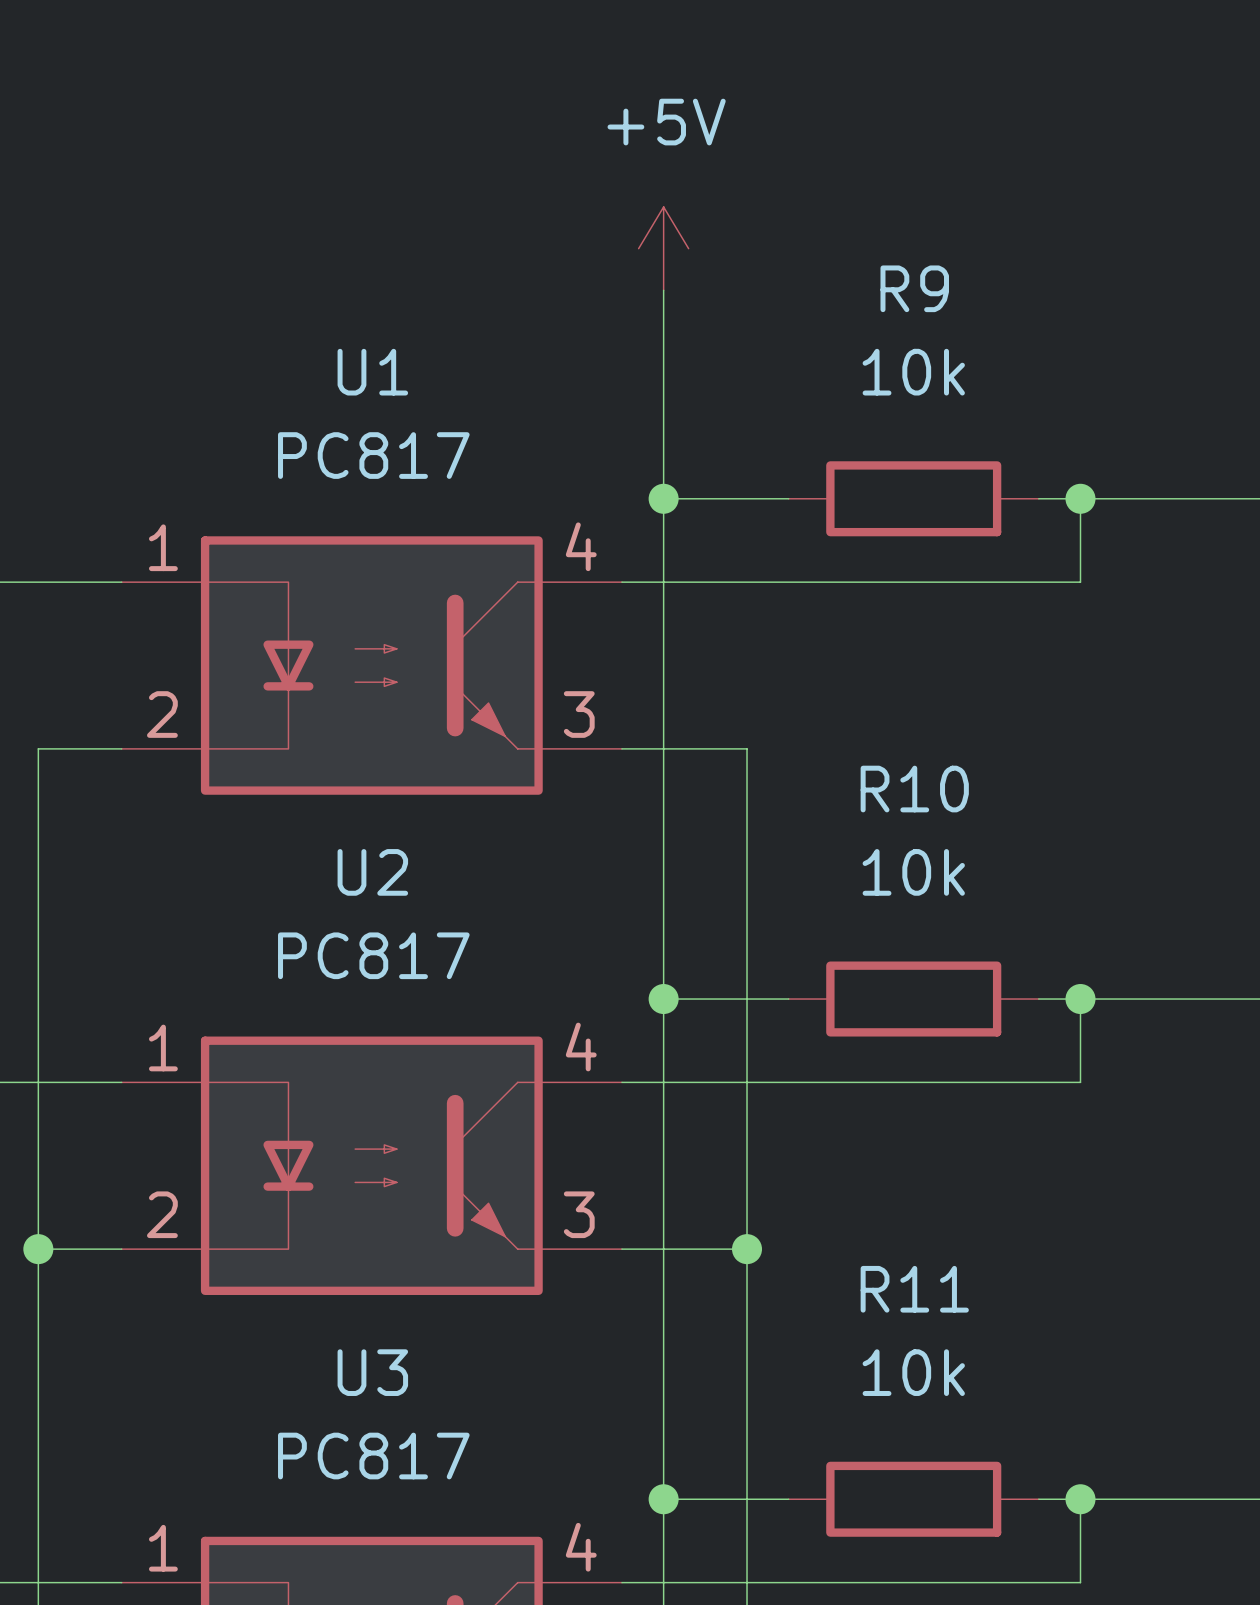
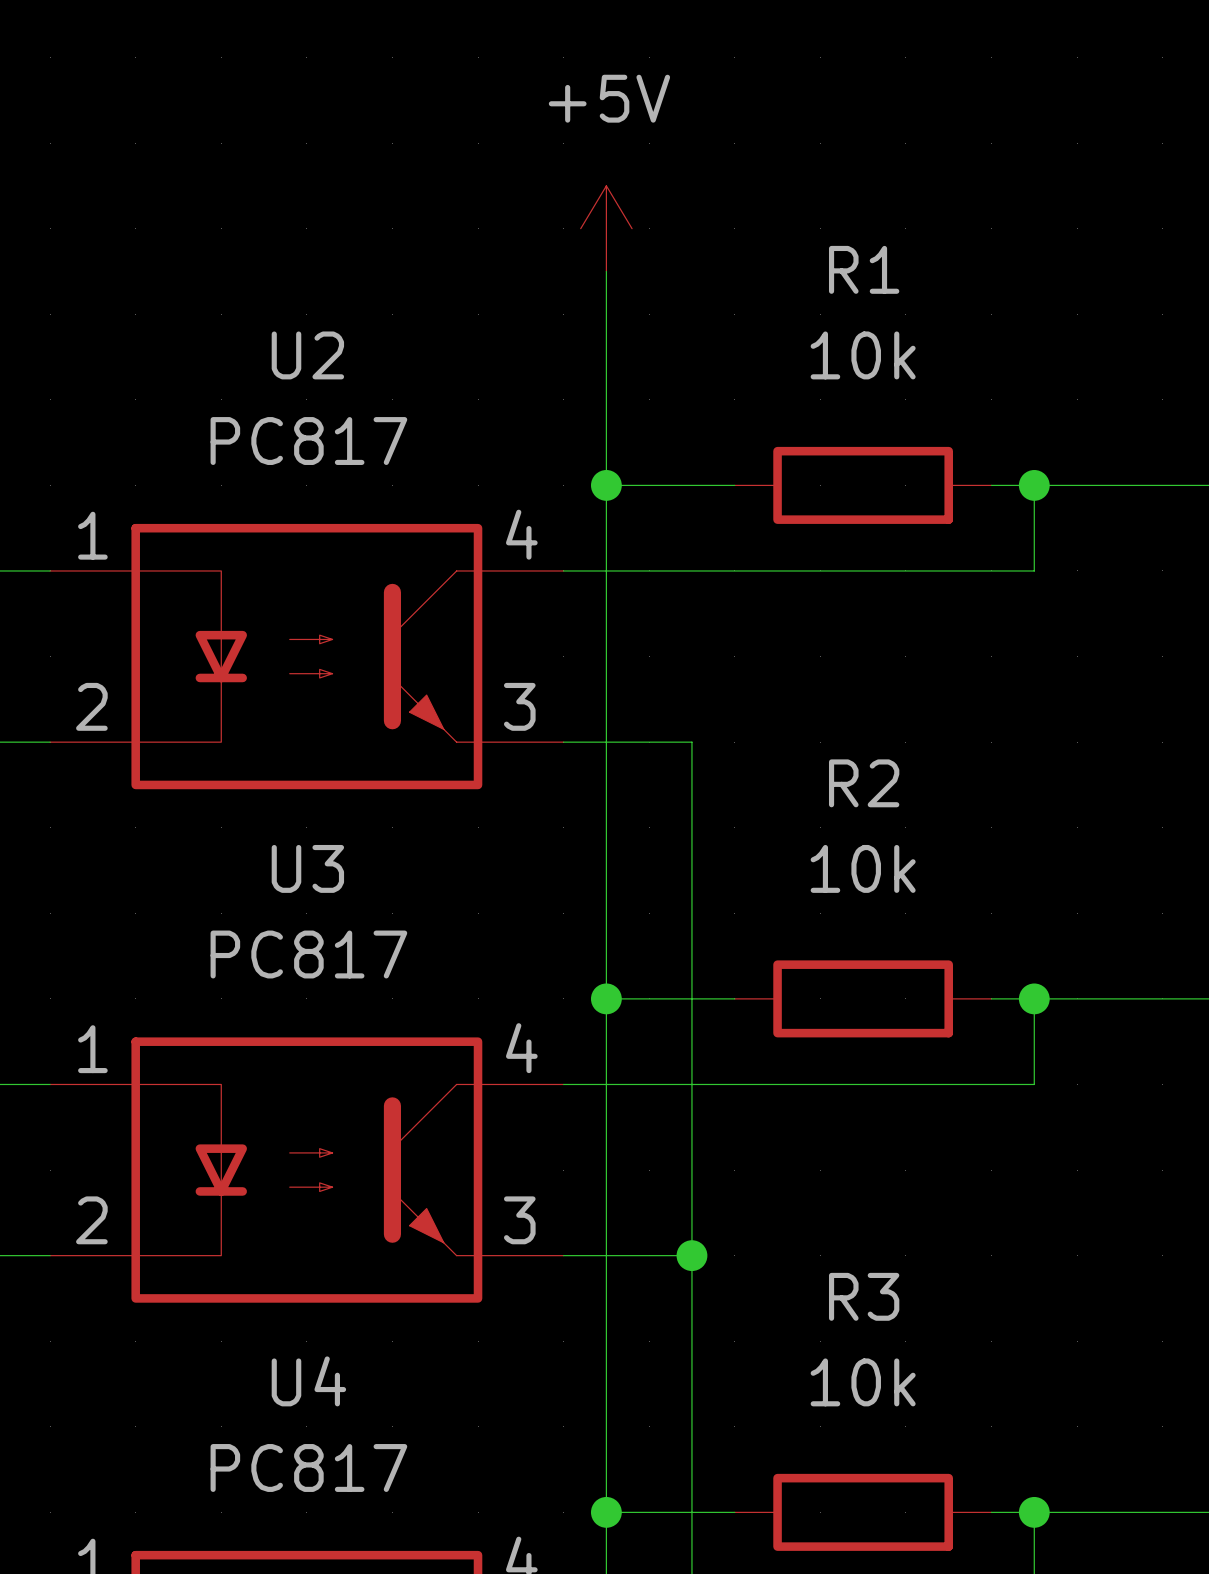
R9 name: R9 (914, 288) -> R1 (864, 269)
U1 name: U1 (372, 372) -> U2 (307, 355)
R10 name: R10 (914, 789) -> R2 (864, 783)
U2 name: U2 (372, 872) -> U3 (307, 868)
R11 name: R11 (914, 1289) -> R3 (864, 1296)
U3 name: U3 (372, 1372) -> U4 (308, 1381)

